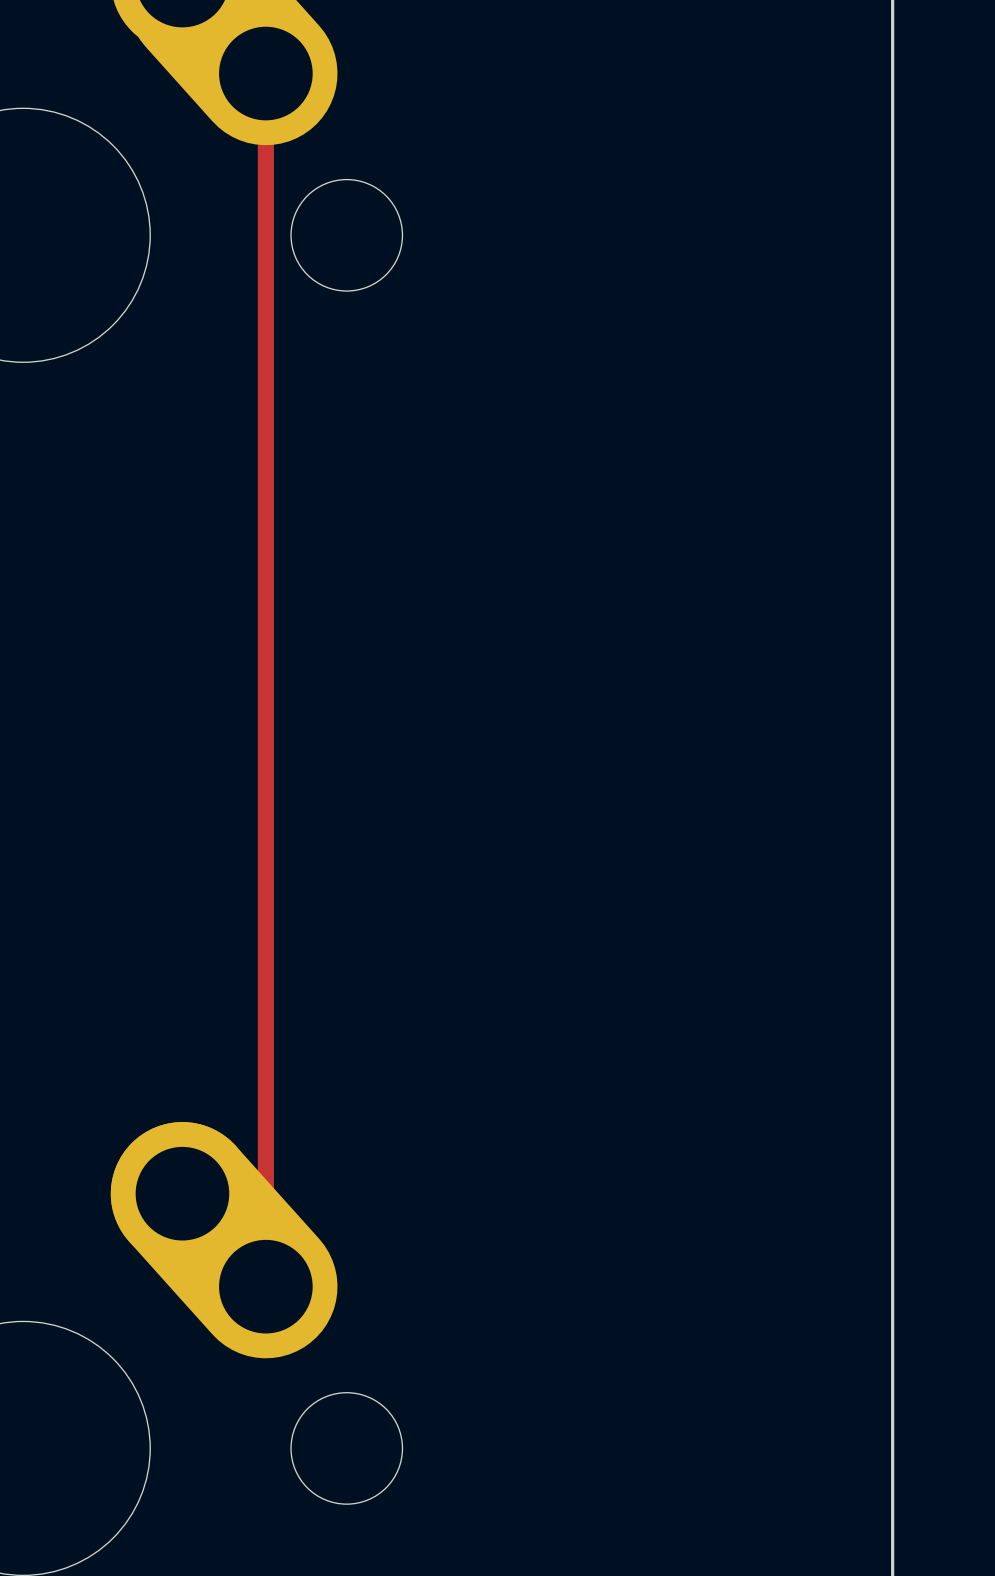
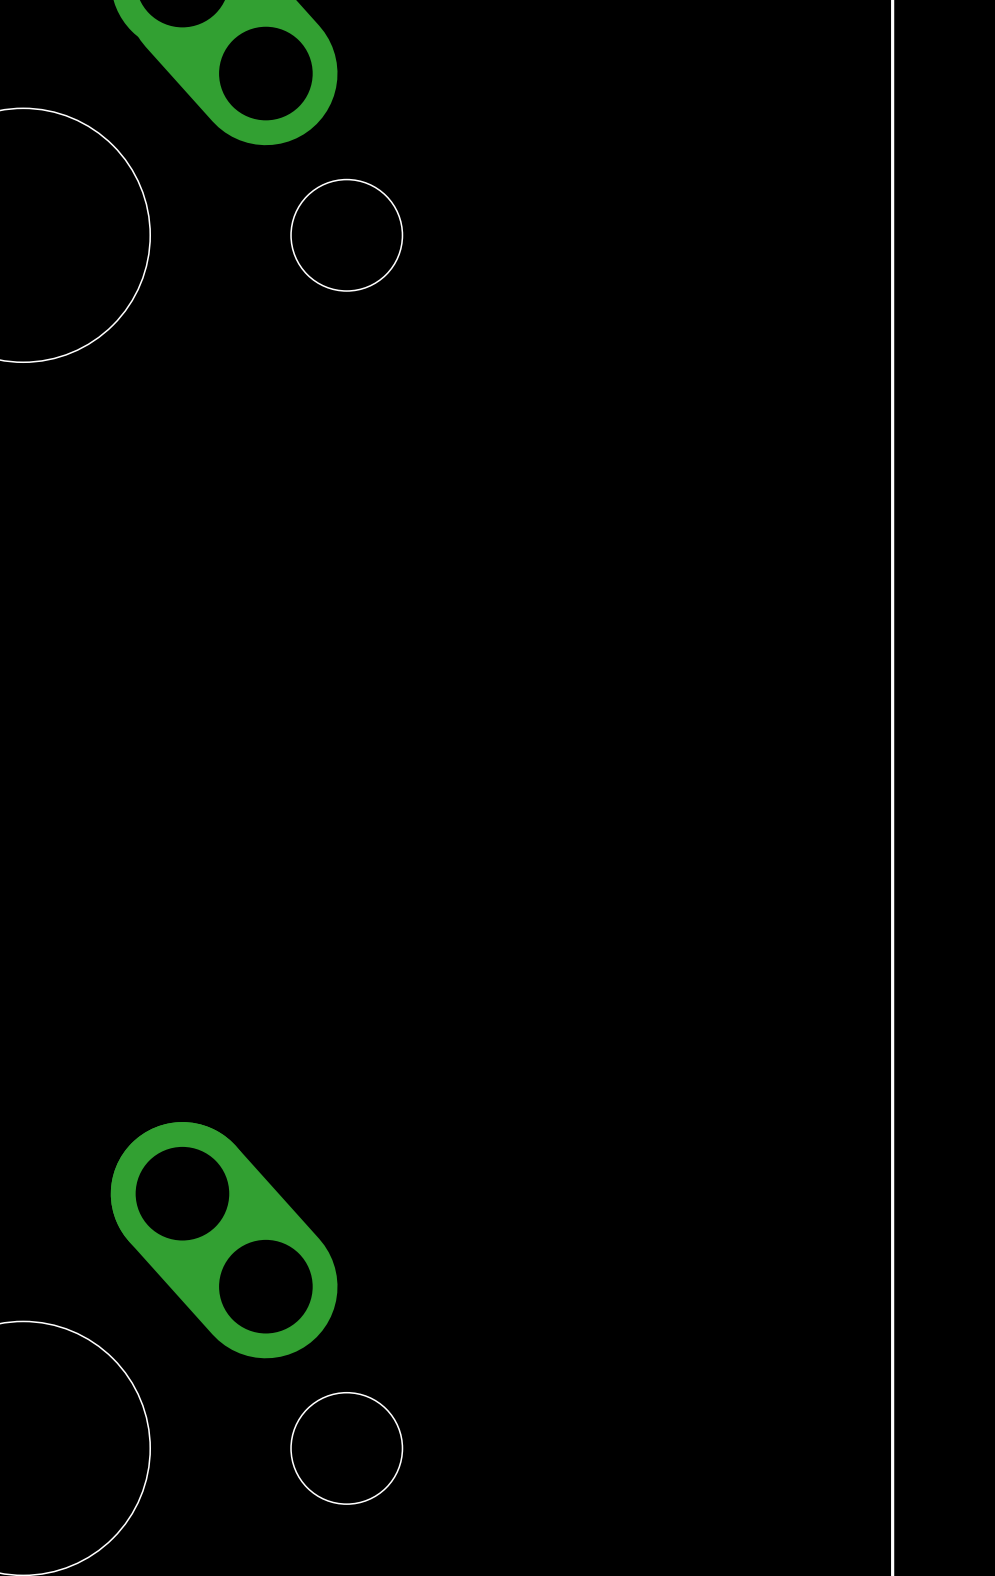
top track: (265, 73) (265, 1286) -> none

